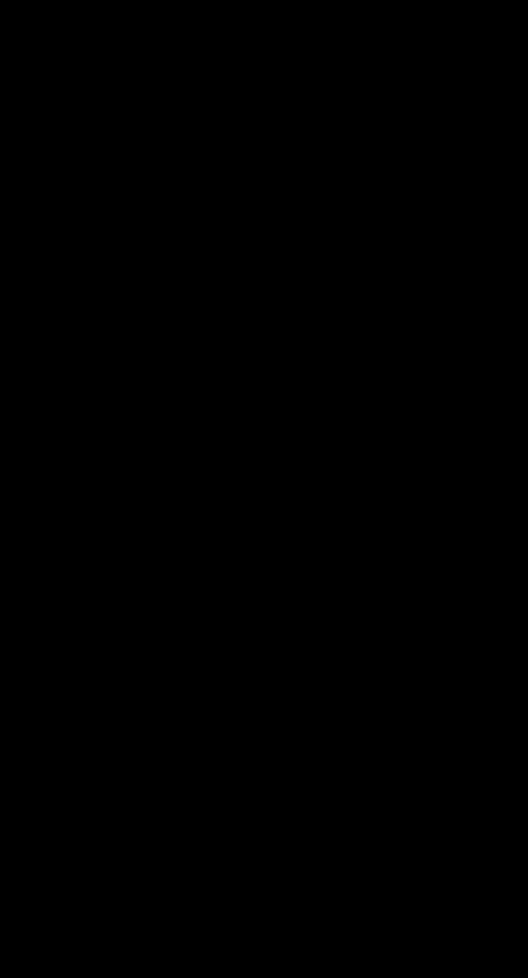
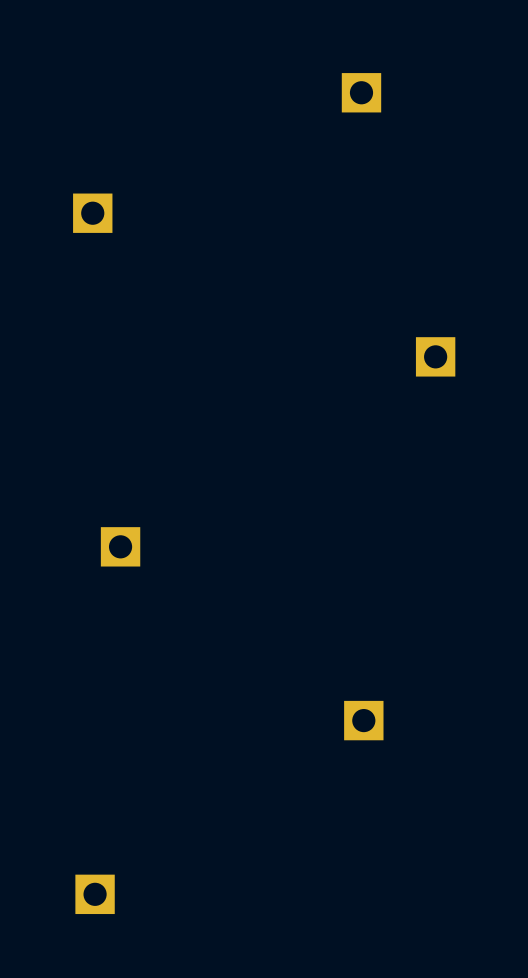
part: none -> (361, 92)
part: none -> (92, 213)
part: none -> (435, 356)
part: none -> (120, 546)
part: none -> (363, 720)
part: none -> (95, 894)

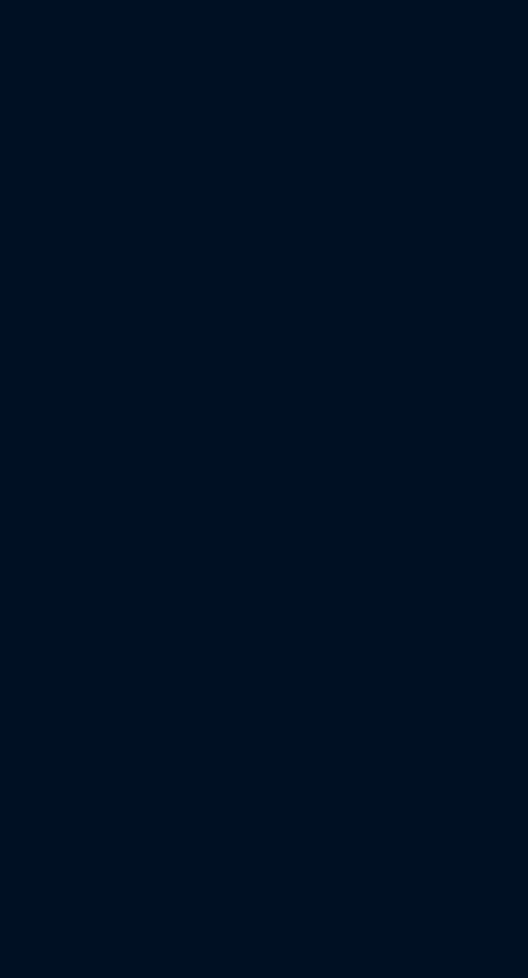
part: (361, 92) -> none
part: (92, 213) -> none
part: (435, 356) -> none
part: (120, 546) -> none
part: (363, 720) -> none
part: (95, 894) -> none

